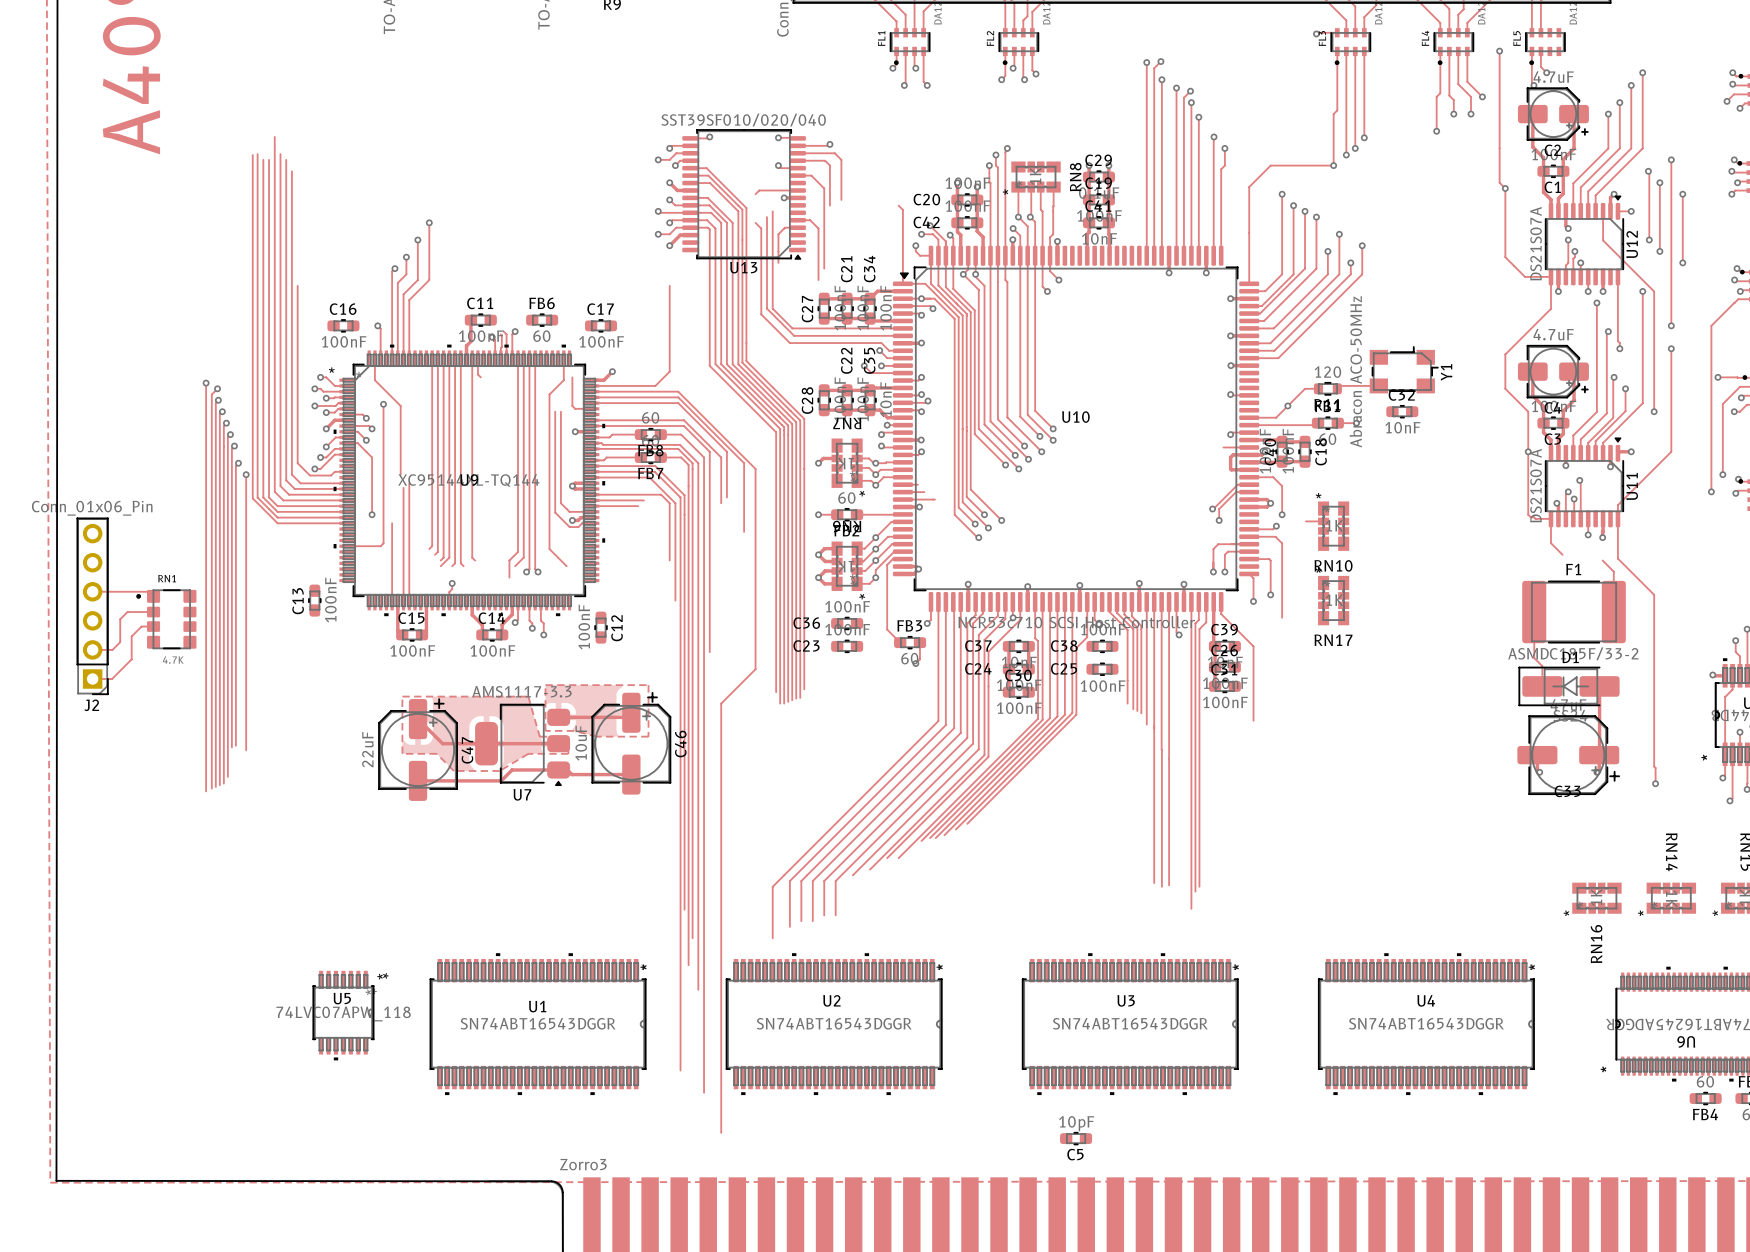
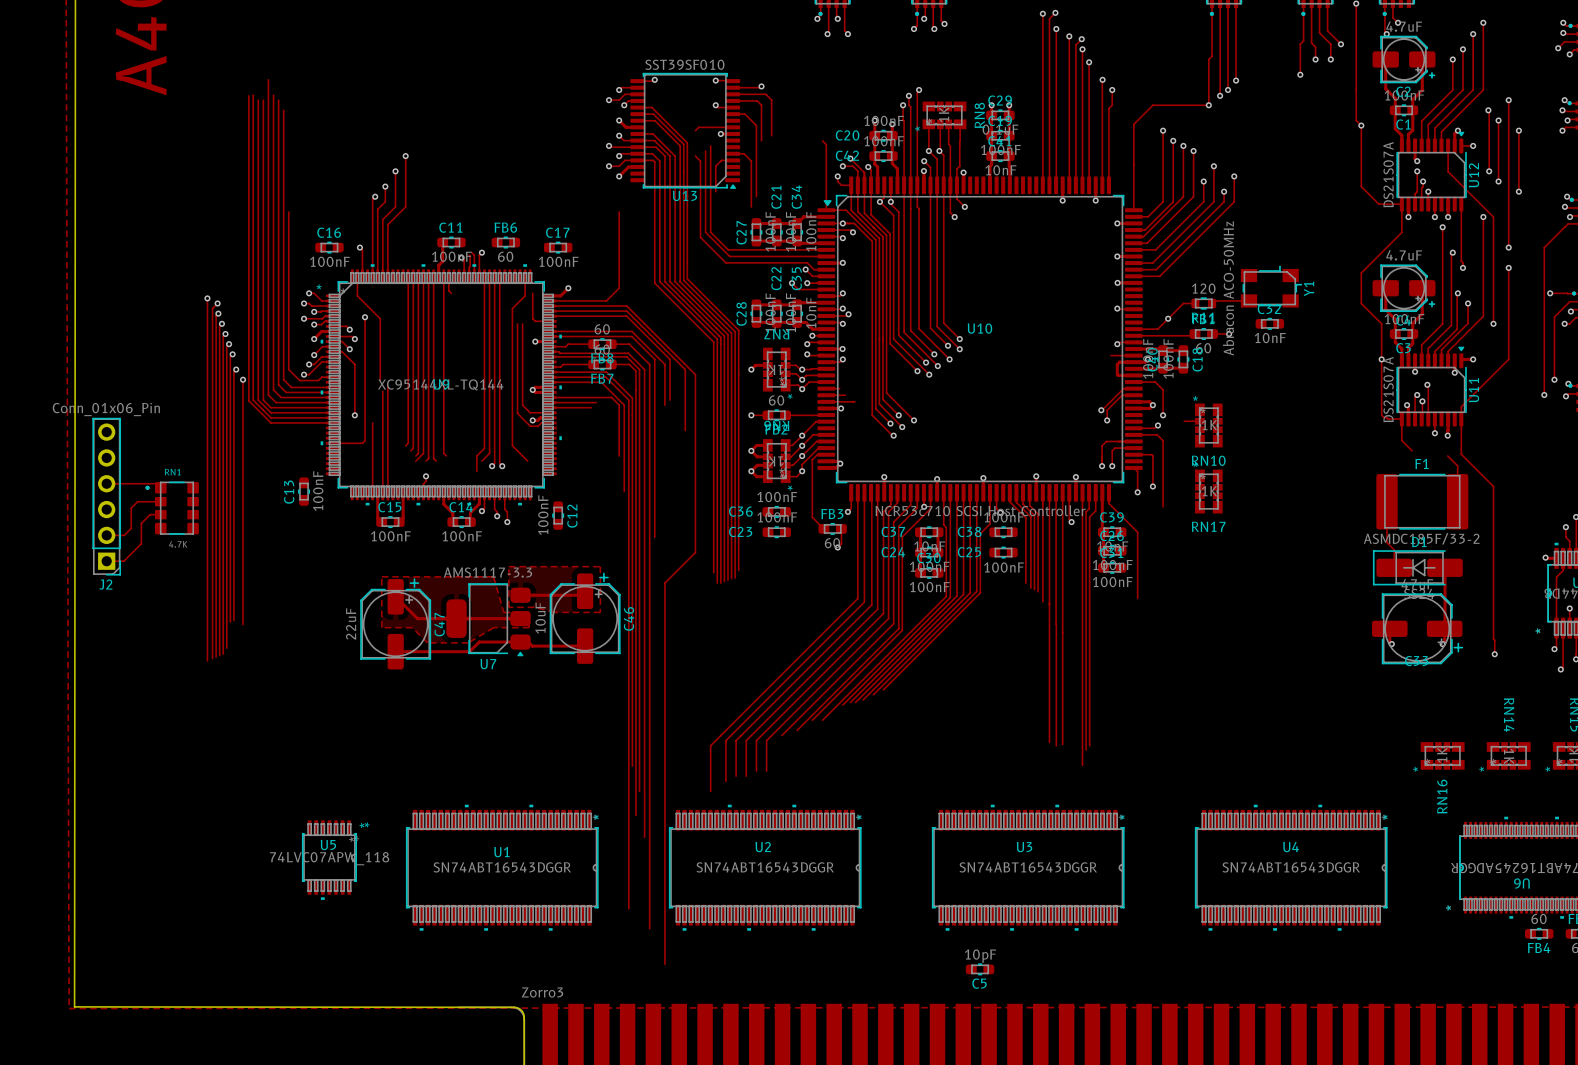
U13 value: SST39SF010/020/040 (743, 120) -> SST39SF010 (684, 64)

